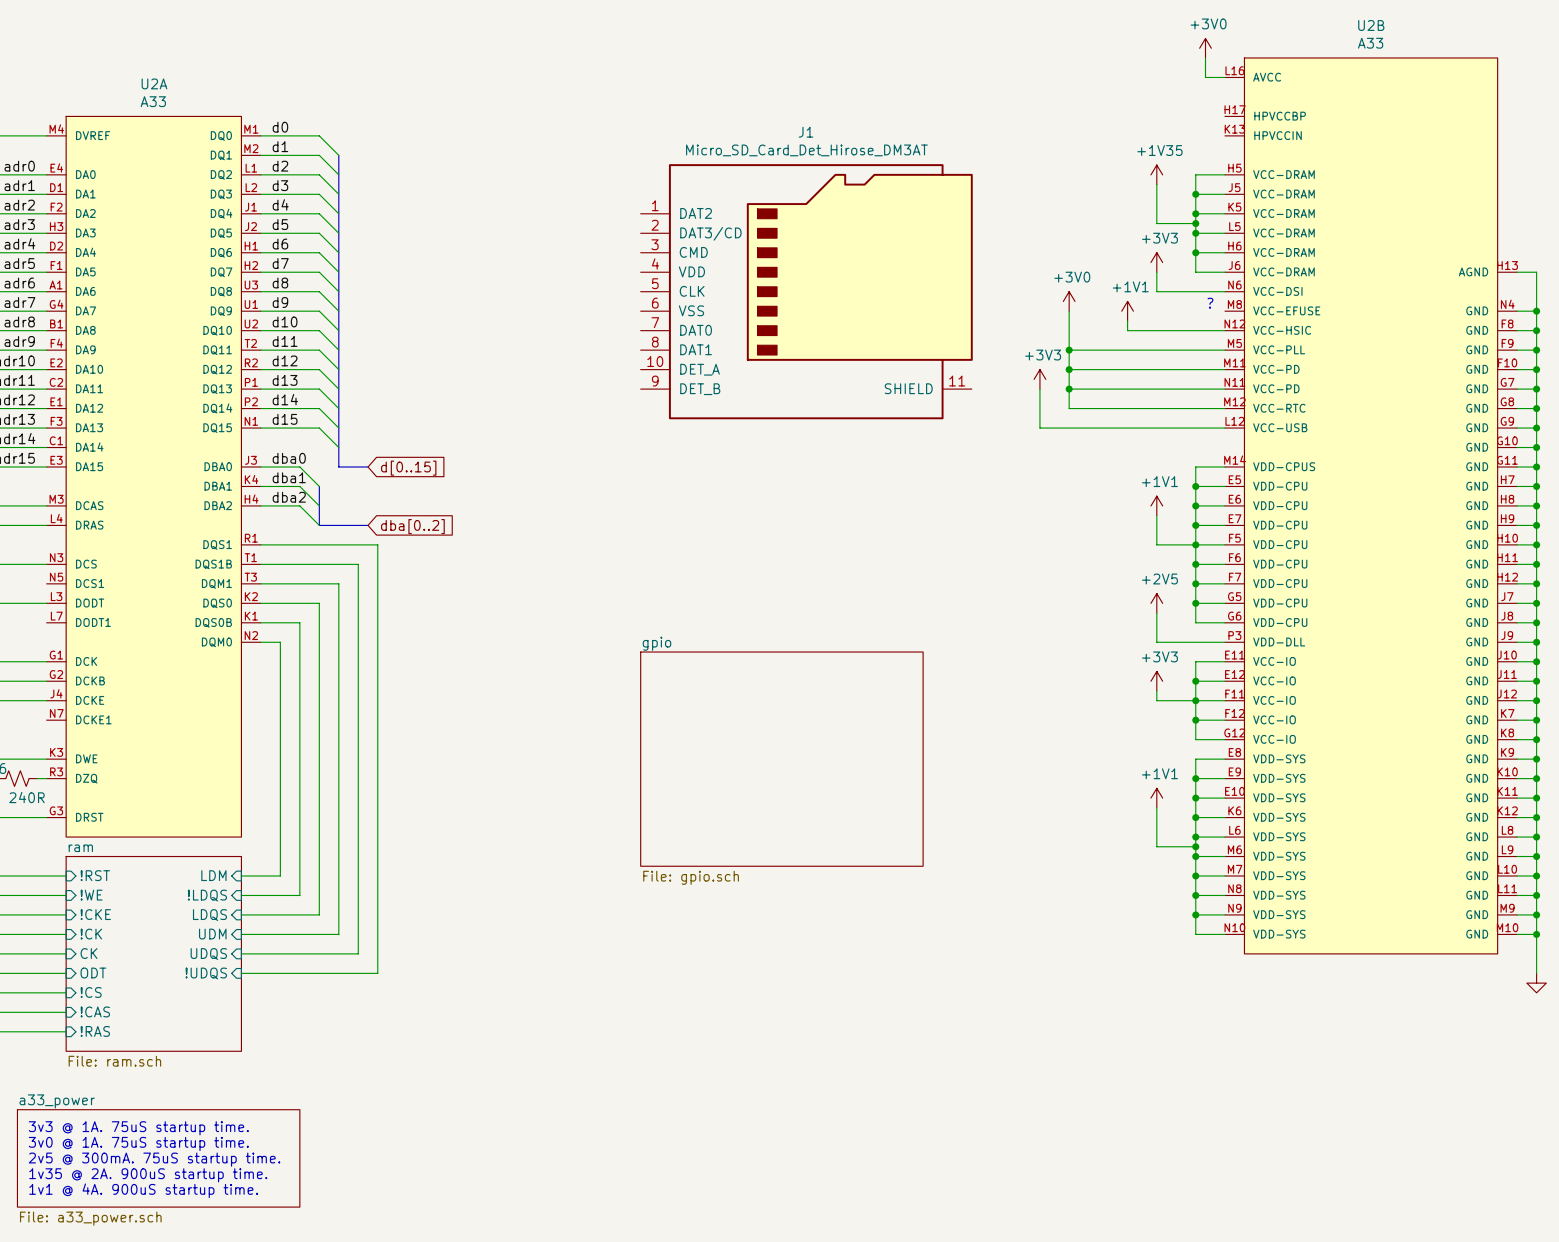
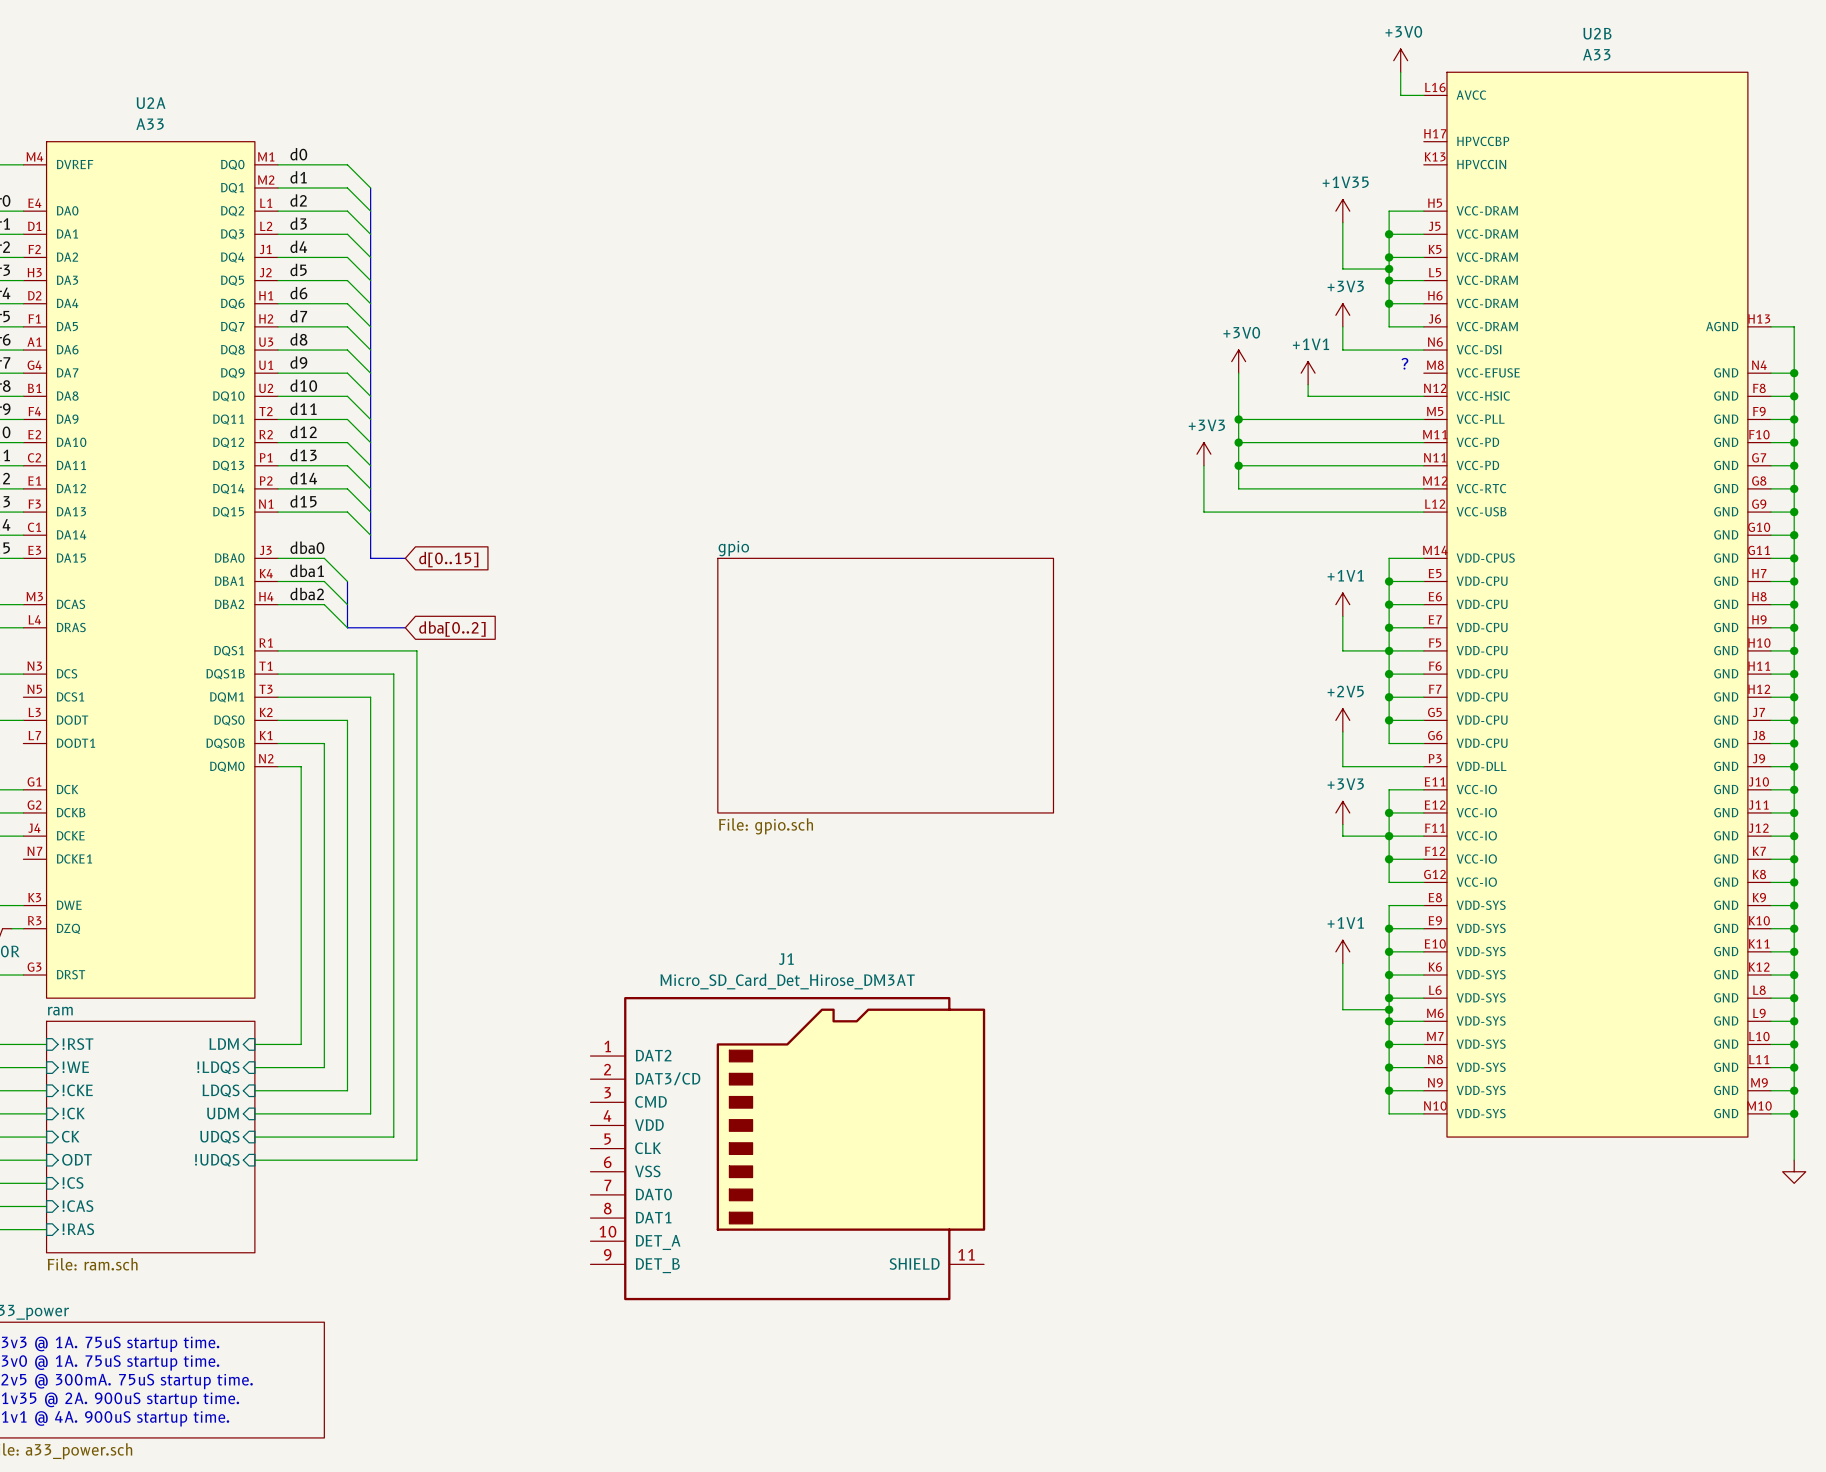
J1 position: (806, 291) -> (787, 1148)
sheet gpio position: (781, 759) -> (885, 685)

